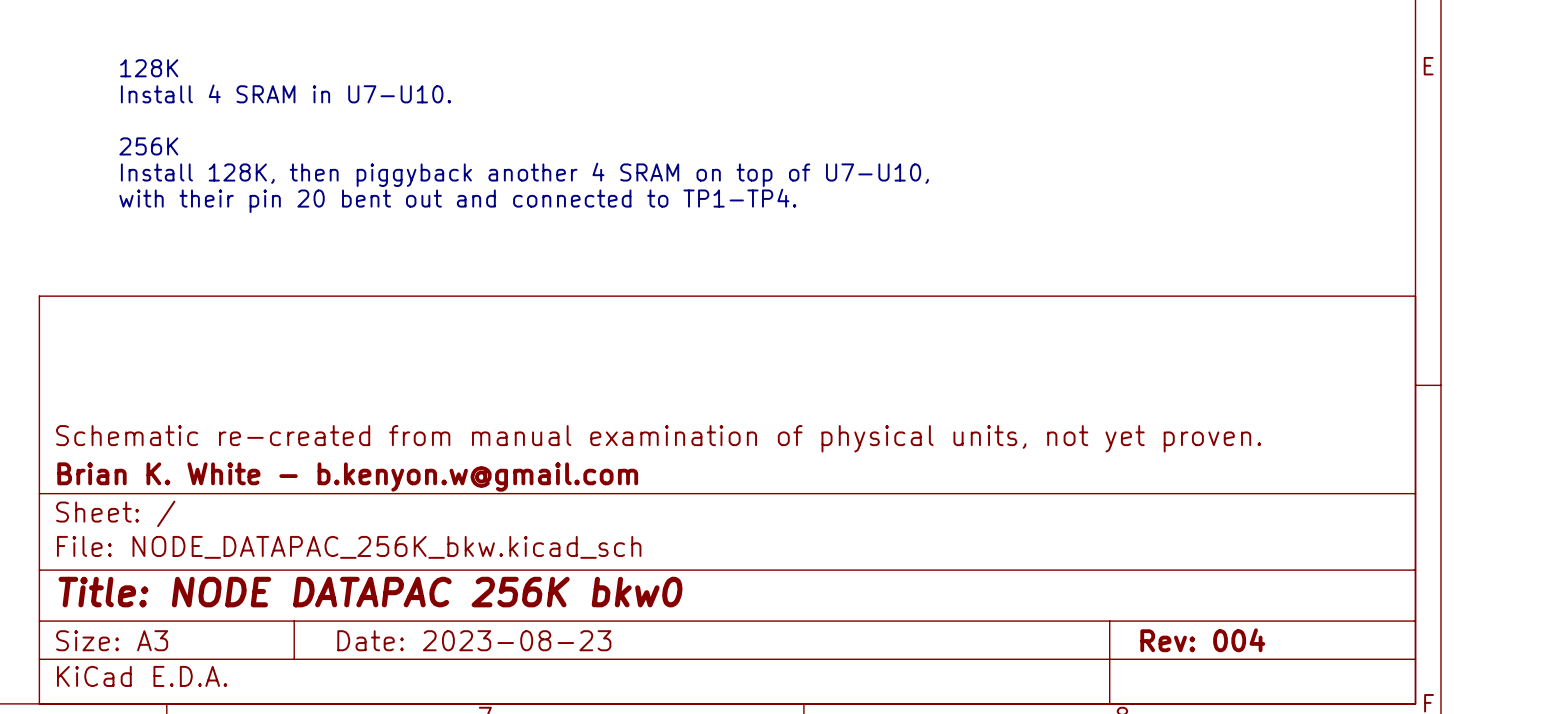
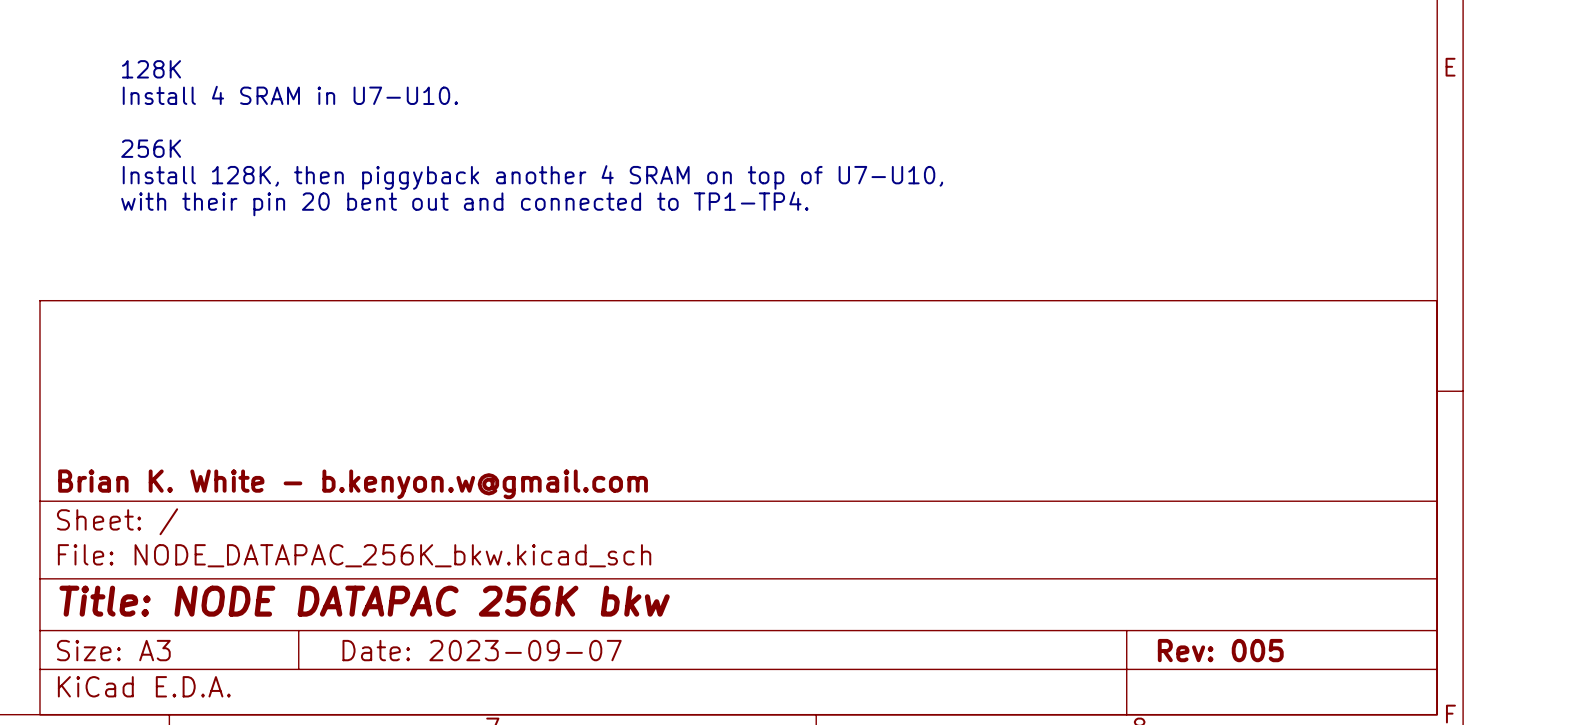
title block: Schematic re-created from manual examination of physical units, not yet proven. (658, 438) -> none
title block: Title: NODE DATAPAC 256K bkw0 (370, 592) -> Title: NODE DATAPAC 256K bkw (364, 601)
title block: Date: 2023-08-23 (474, 640) -> Date: 2023-09-07 (482, 650)
title block: Rev: 004 (1202, 640) -> Rev: 005 (1220, 650)

